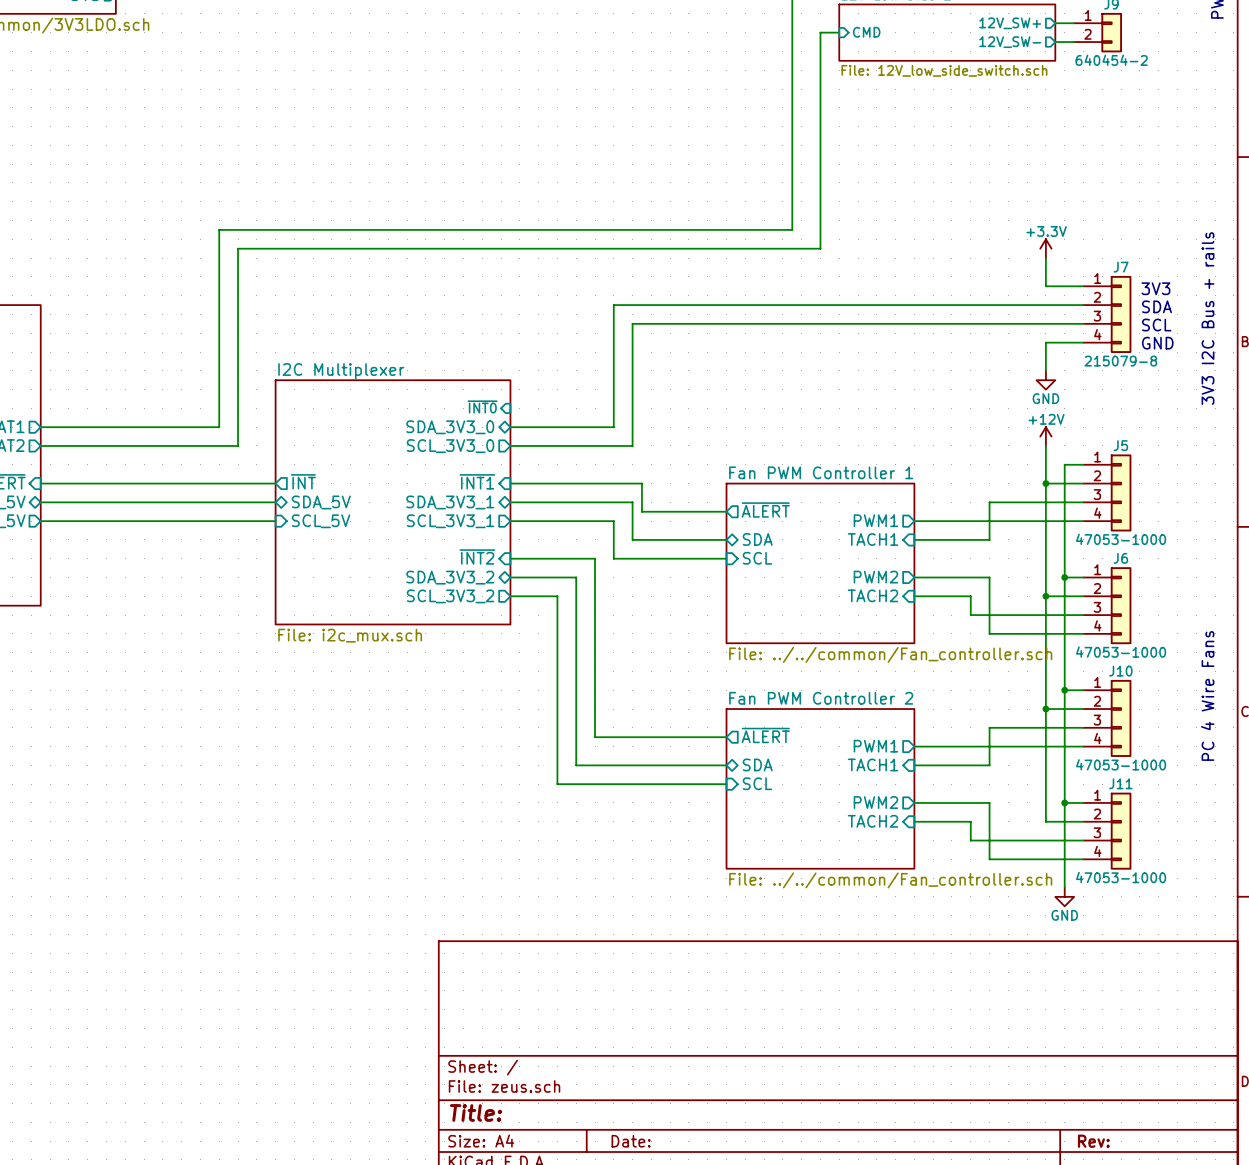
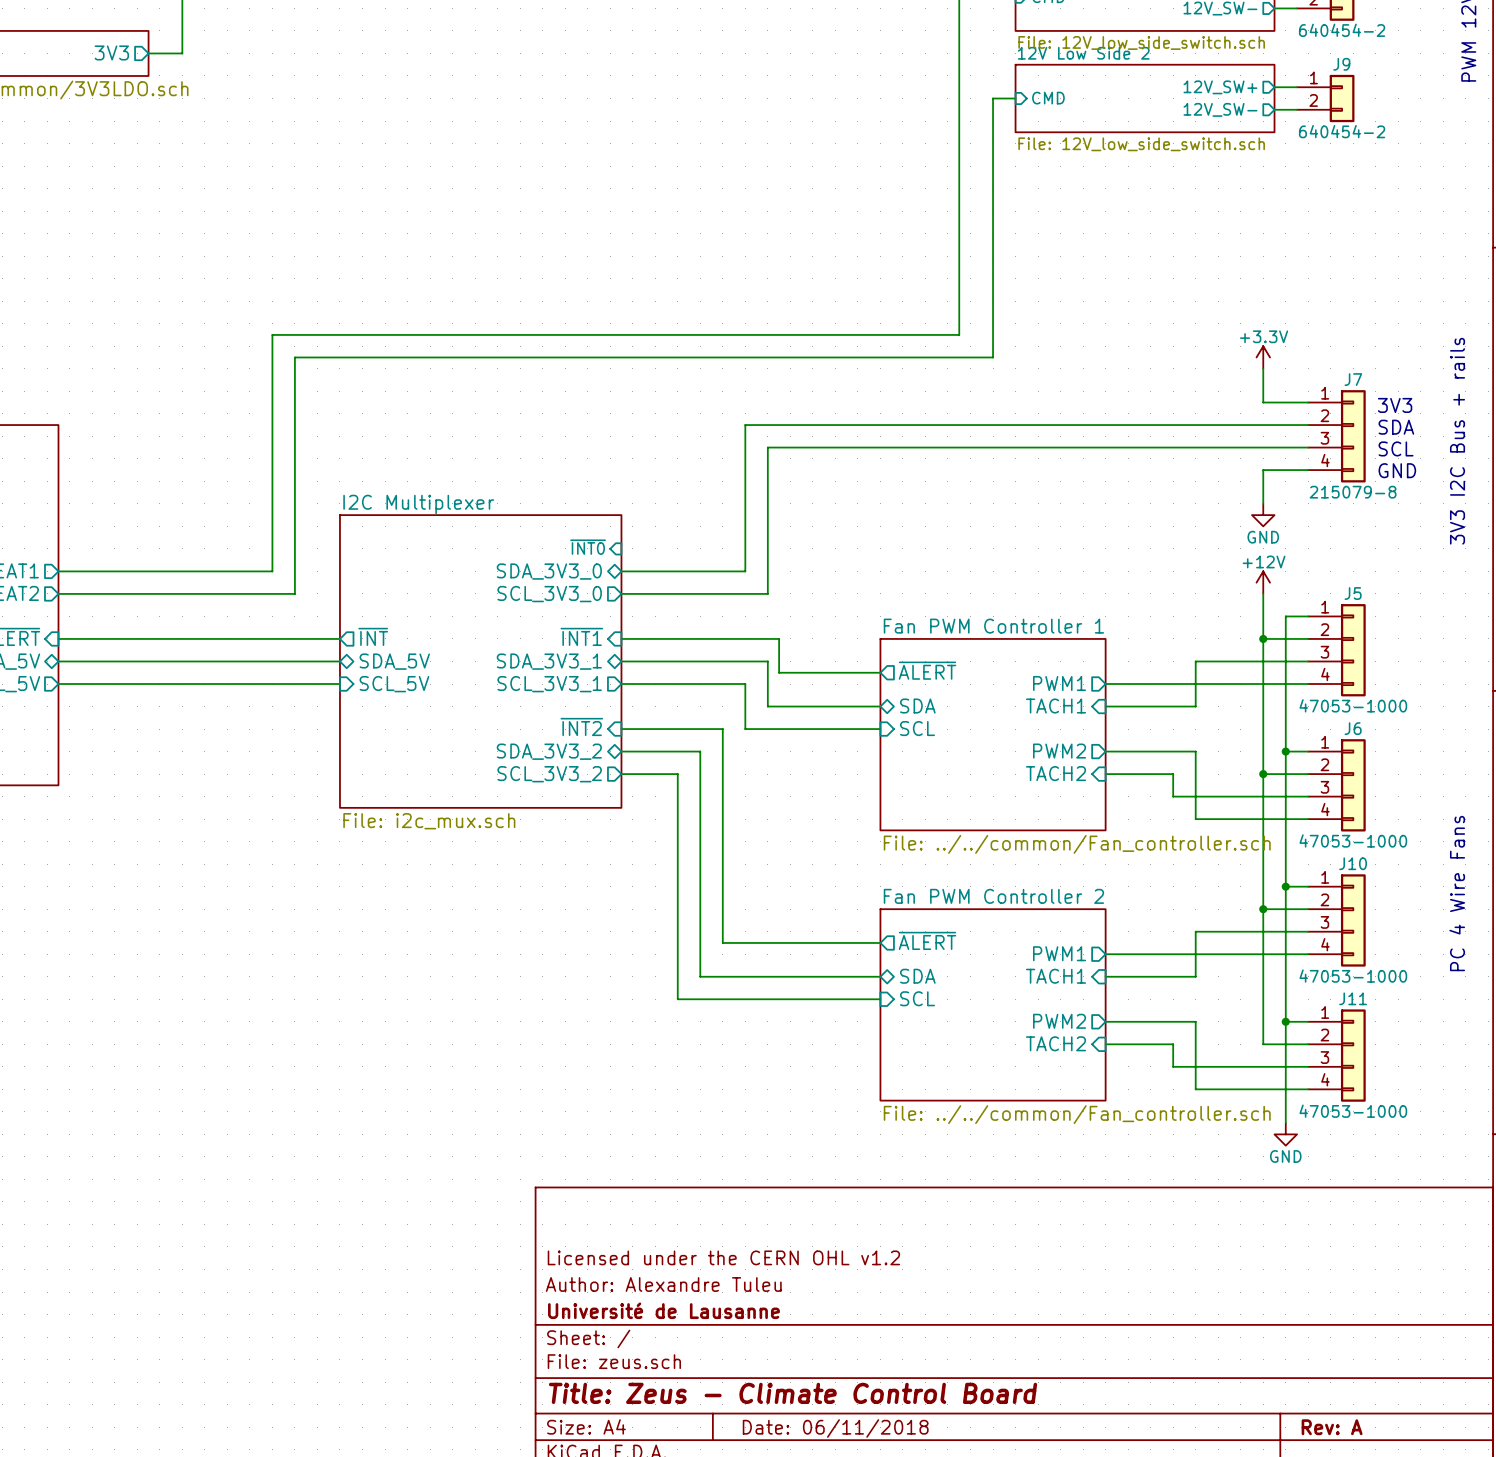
title block: none -> Licensed under the CERN OHL v1.2 (723, 1257)
title block: none -> Author: Alexandre Tuleu (663, 1284)
title block: none -> Université de Lausanne (663, 1310)
title block: Title: (476, 1112) -> Title: Zeus - Climate Control Board (793, 1393)
title block: Date: (631, 1141) -> Date: 06/11/2018 (835, 1428)
title block: Rev: (1093, 1141) -> Rev: A (1332, 1427)

